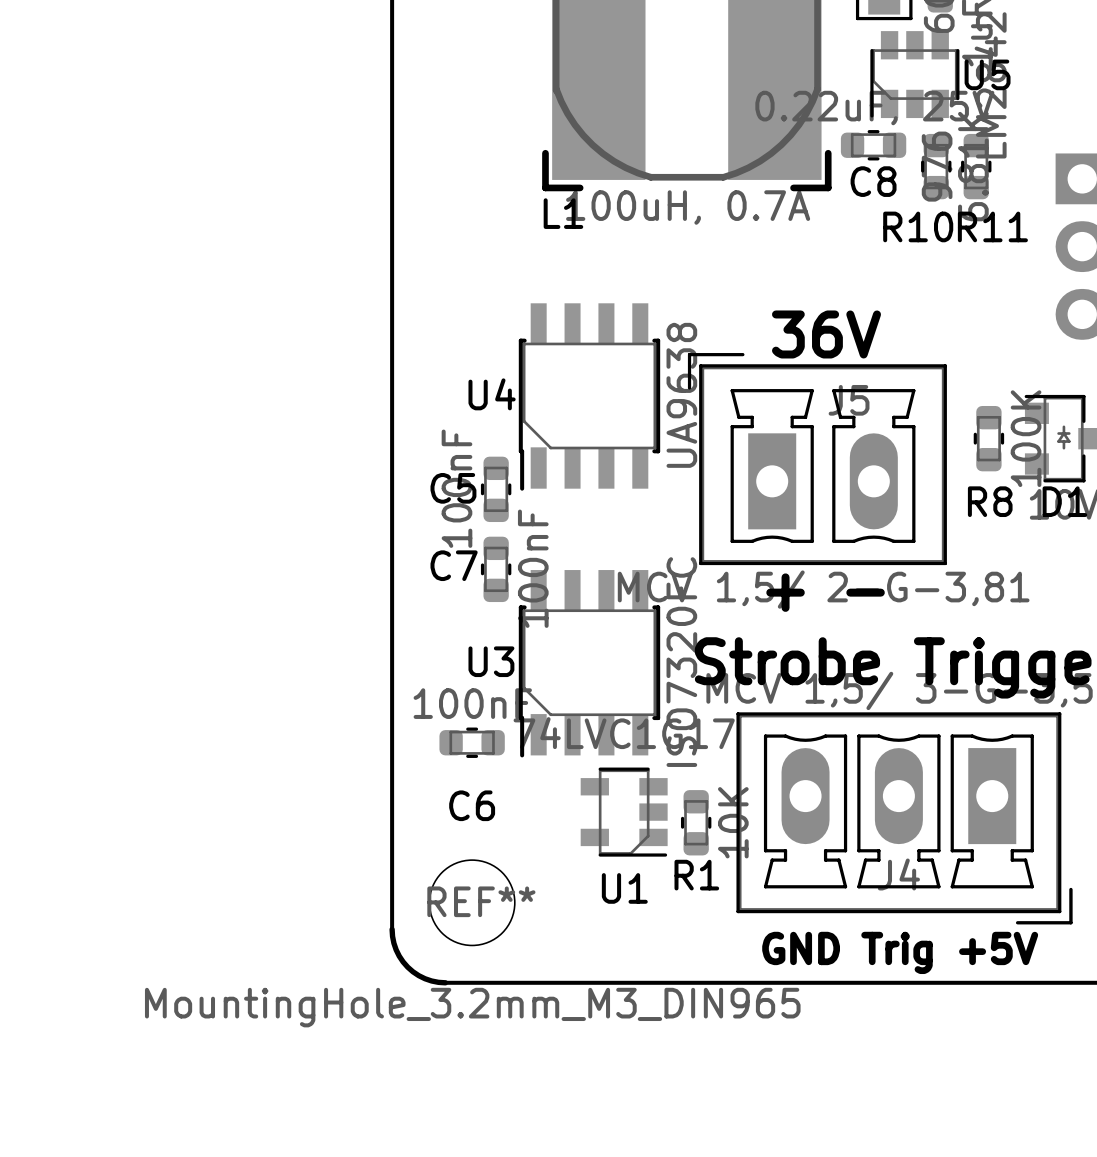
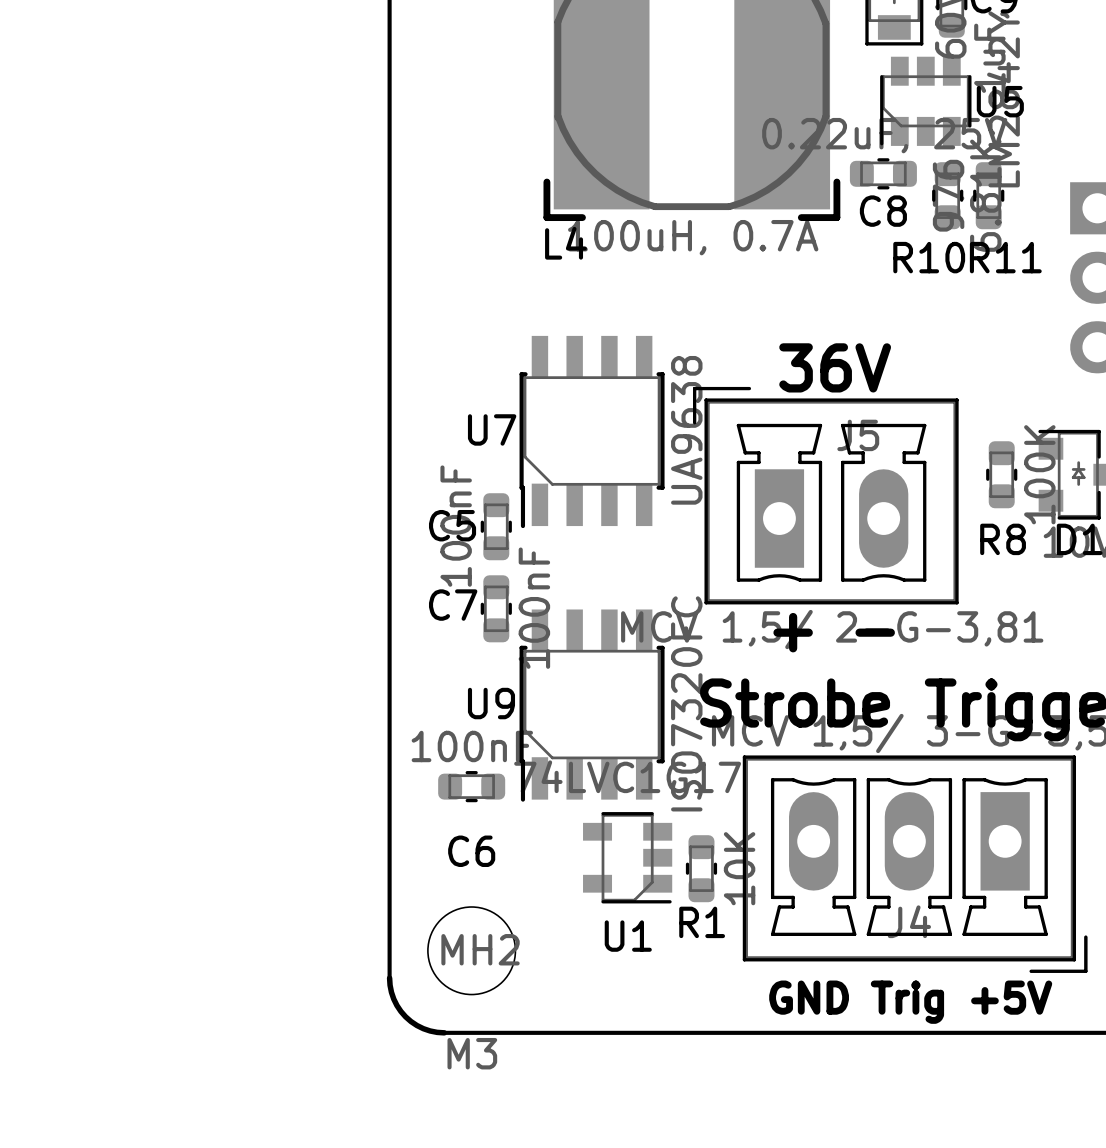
L1 name: L1 (563, 213) -> L4 (565, 243)
U4 name: U4 (492, 394) -> U7 (492, 429)
U3 name: U3 (491, 661) -> U9 (491, 703)
REF** name: REF** (481, 901) -> MH2 (480, 949)
REF** value: MountingHole_3.2mm_M3_DIN965 (472, 1007) -> M3 (472, 1053)

